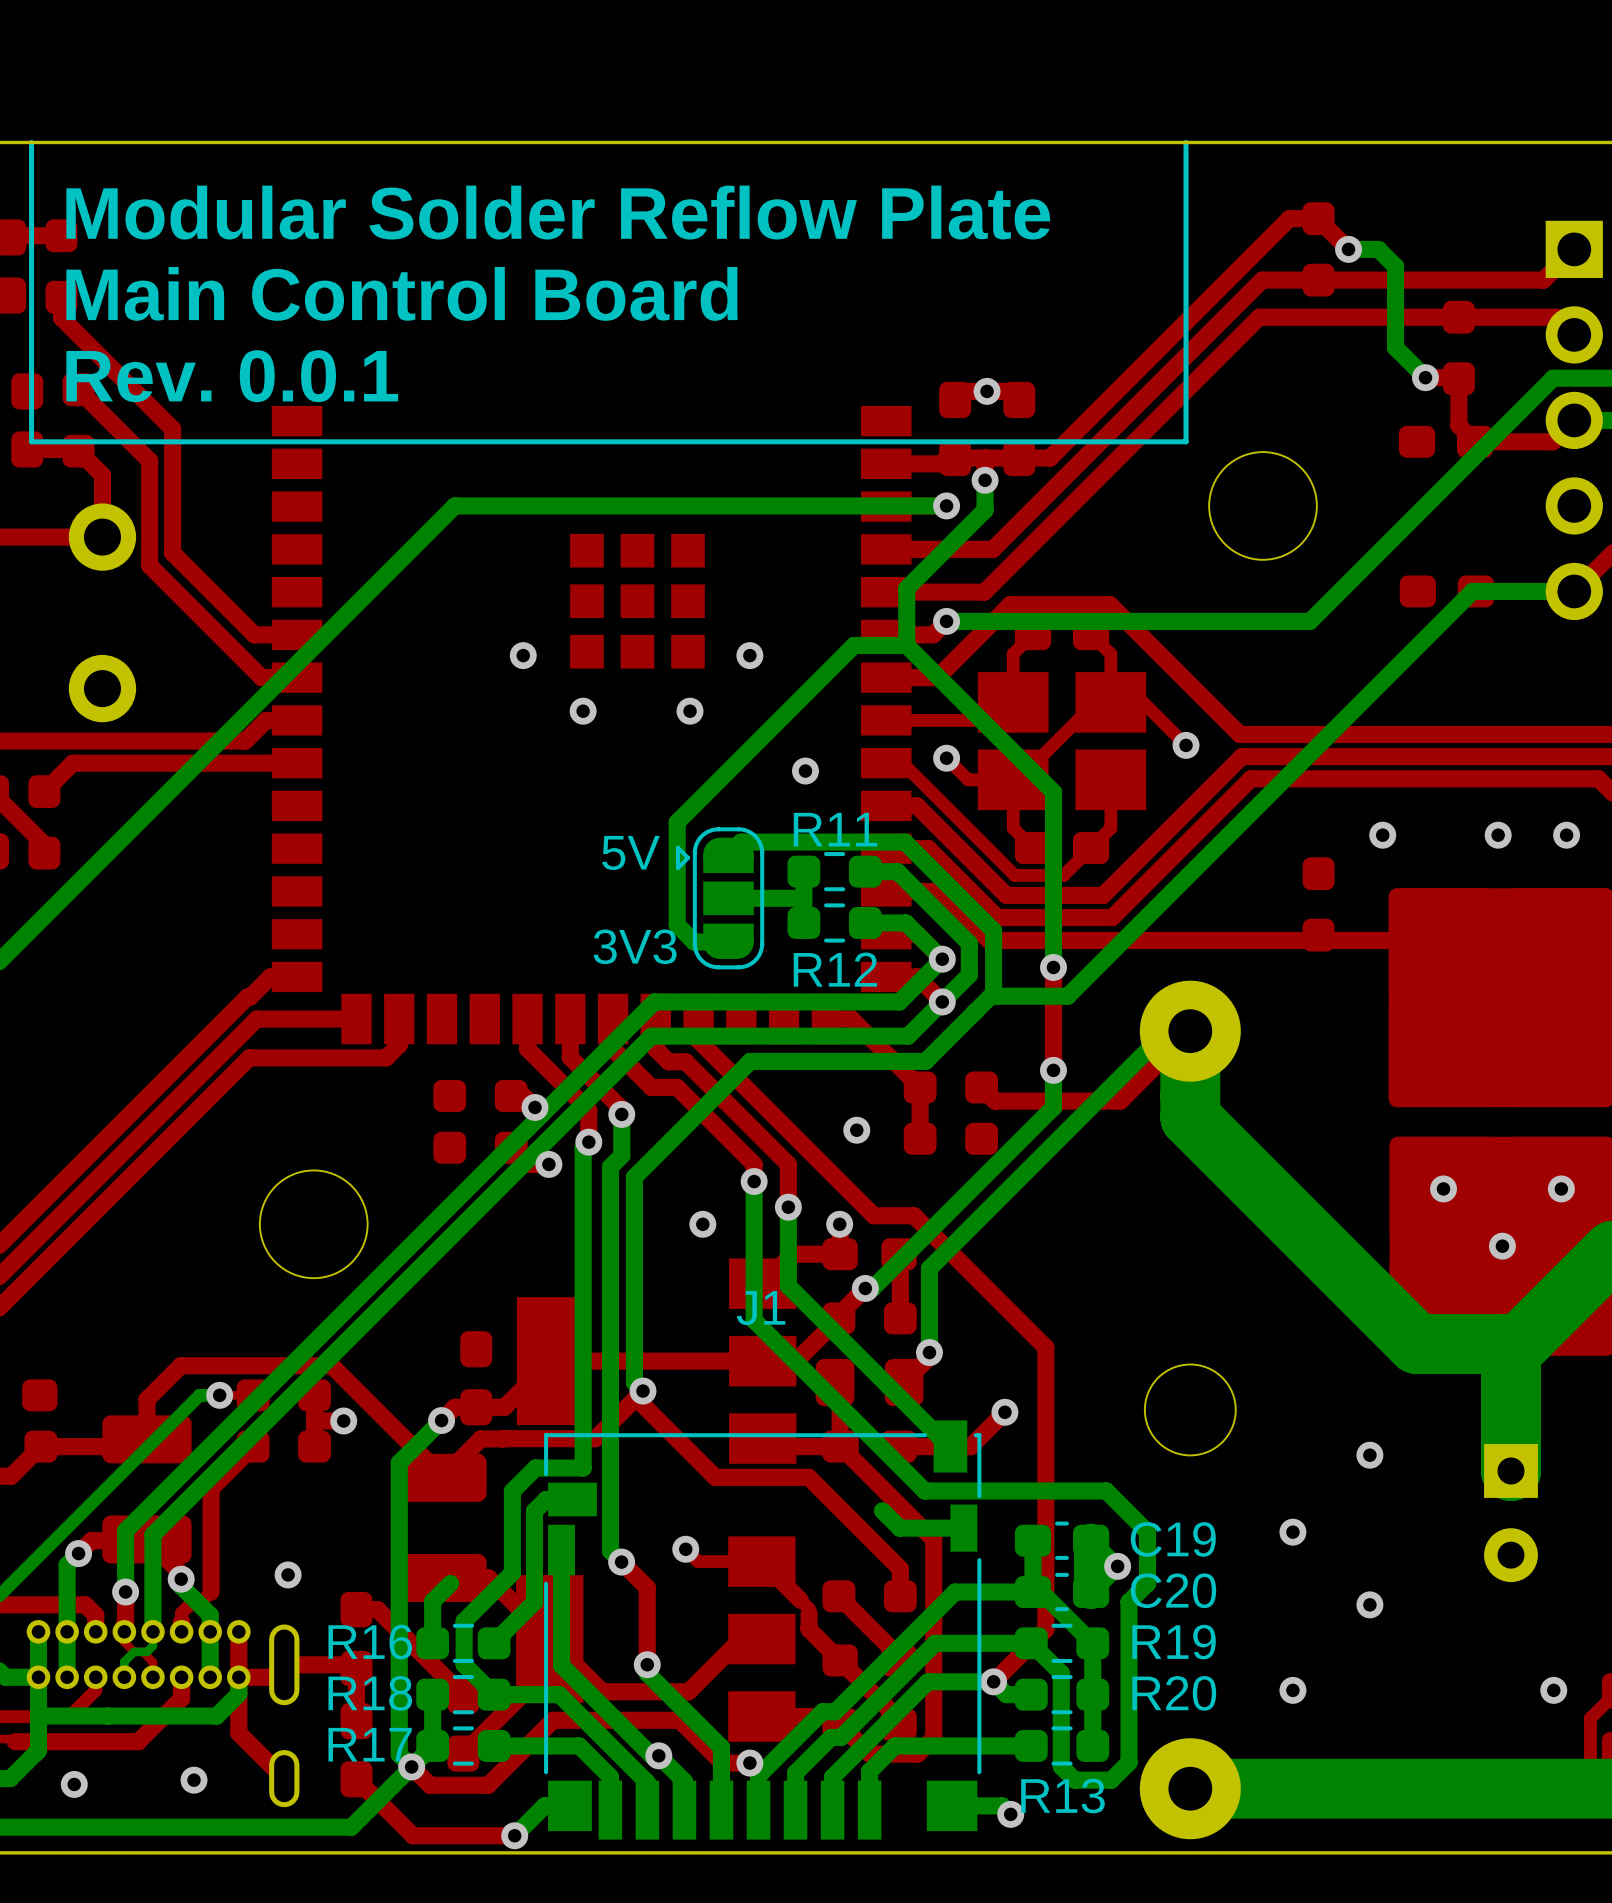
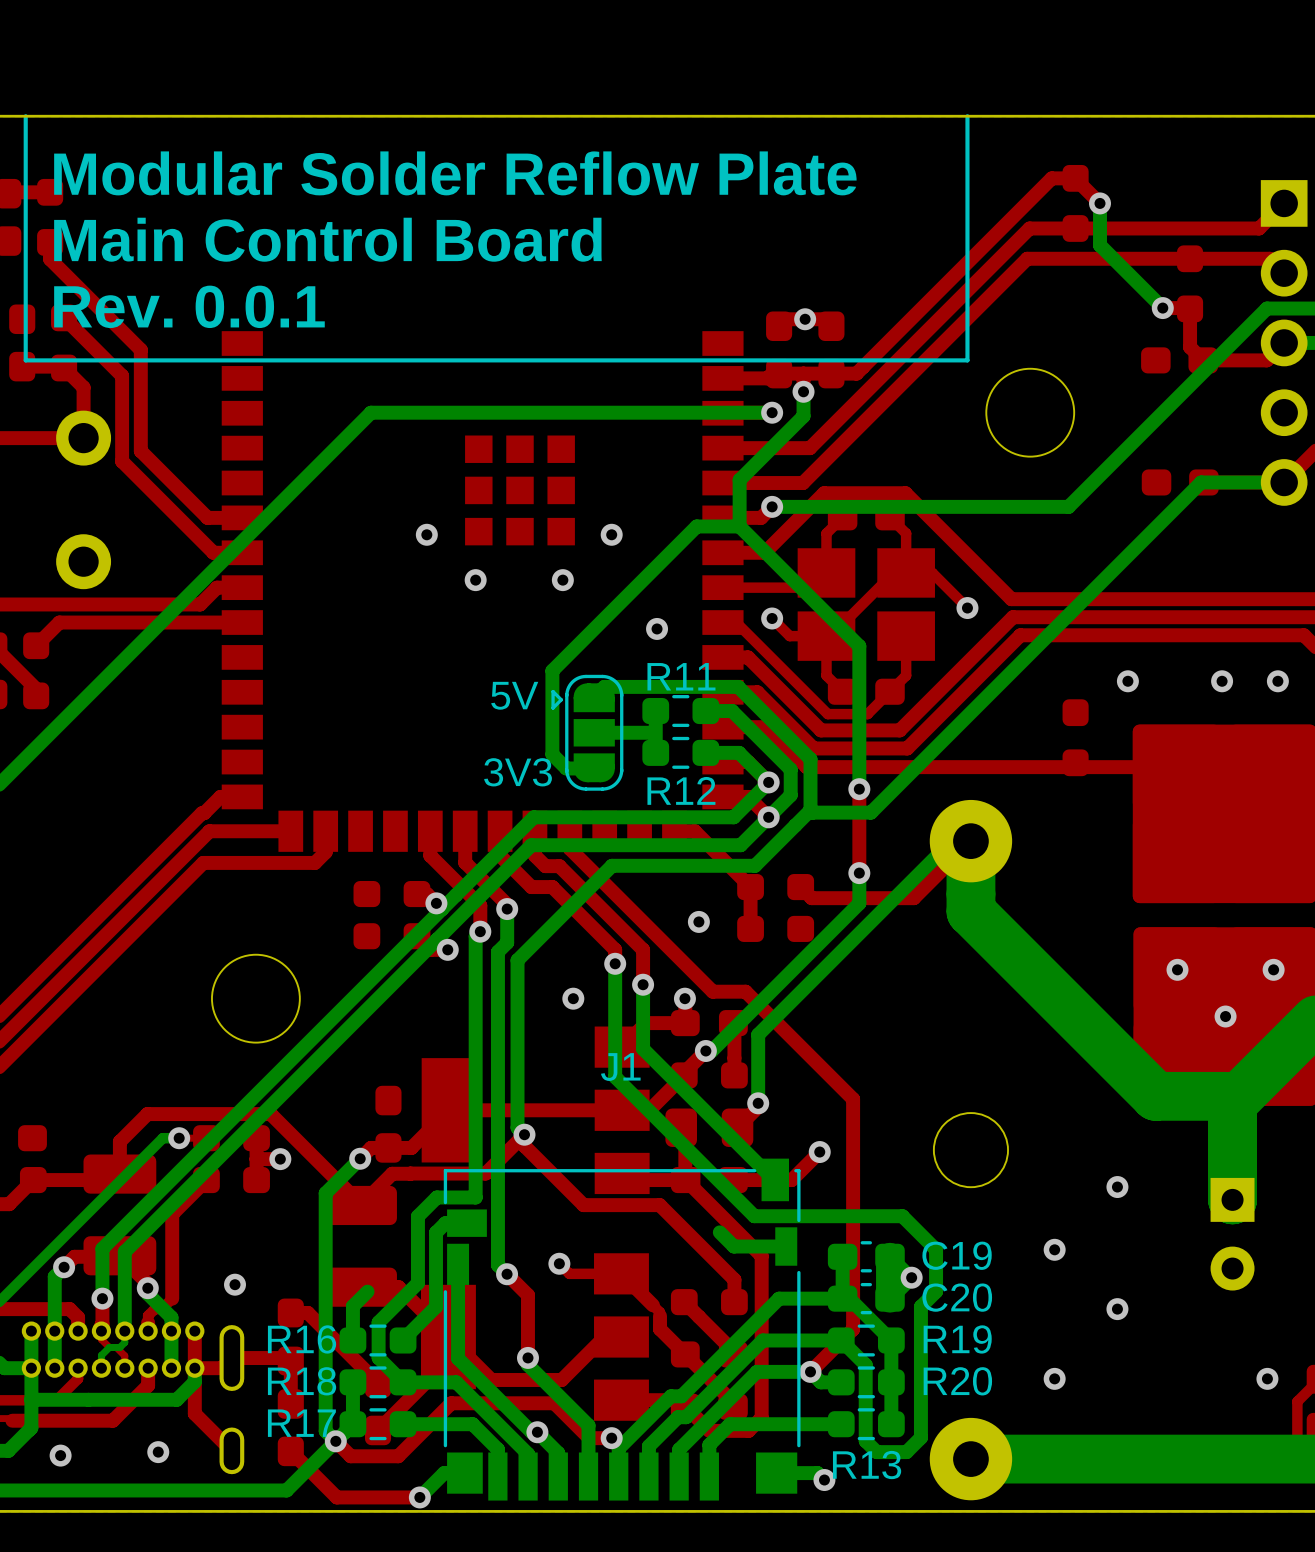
bottom track: (1348, 249) (1378, 249) (1395, 266) (1395, 347) -> (1100, 203) (1100, 245) (1138, 283)

